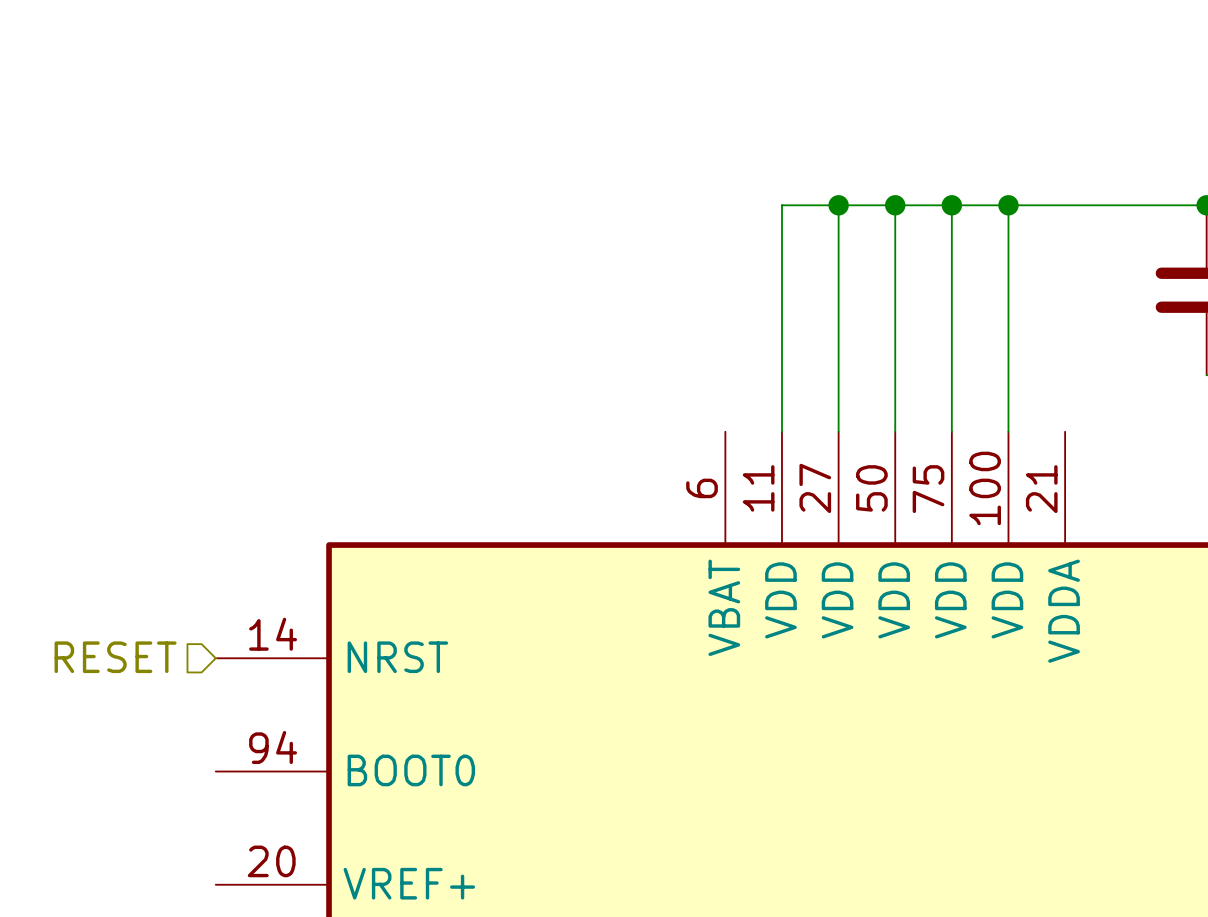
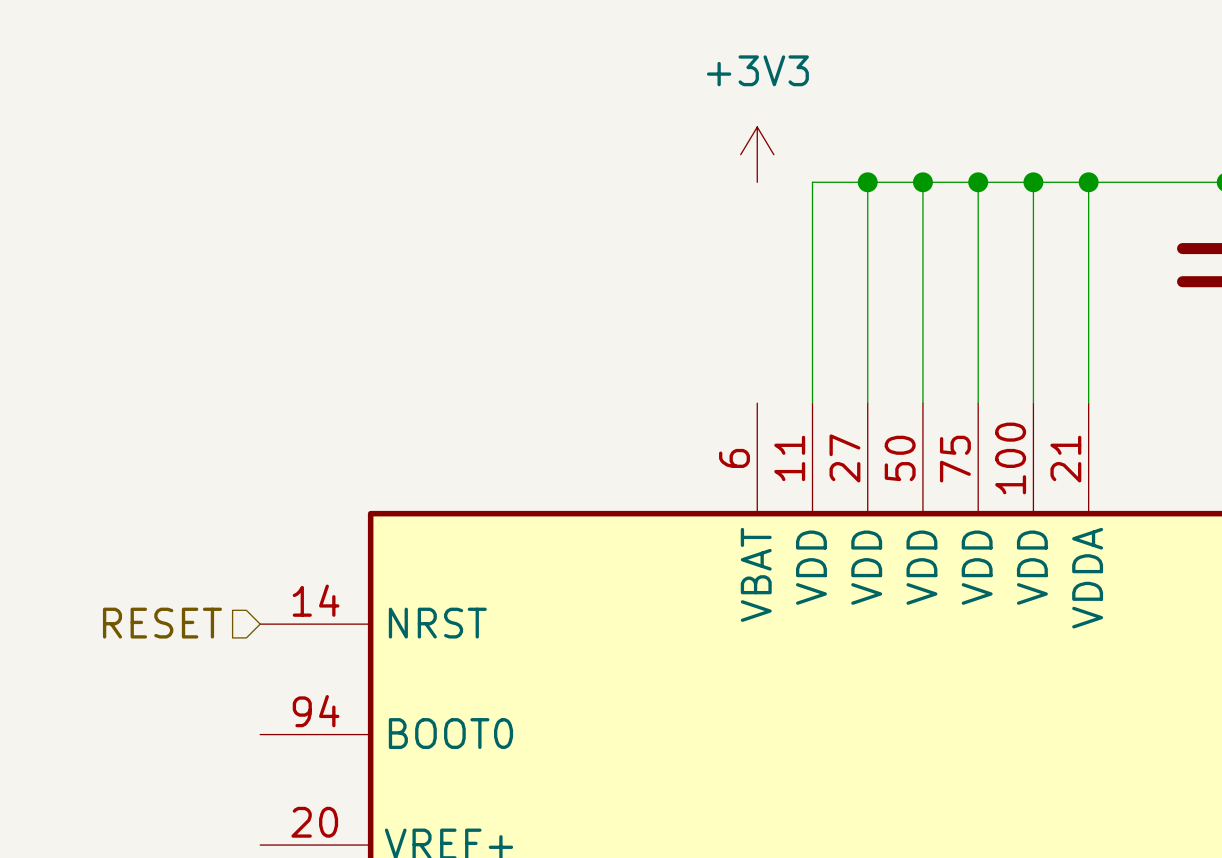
power symbol: none -> +3V3 (757, 154)
wire: none -> (1088, 182) (1088, 403)
junction: none -> (1088, 182)

